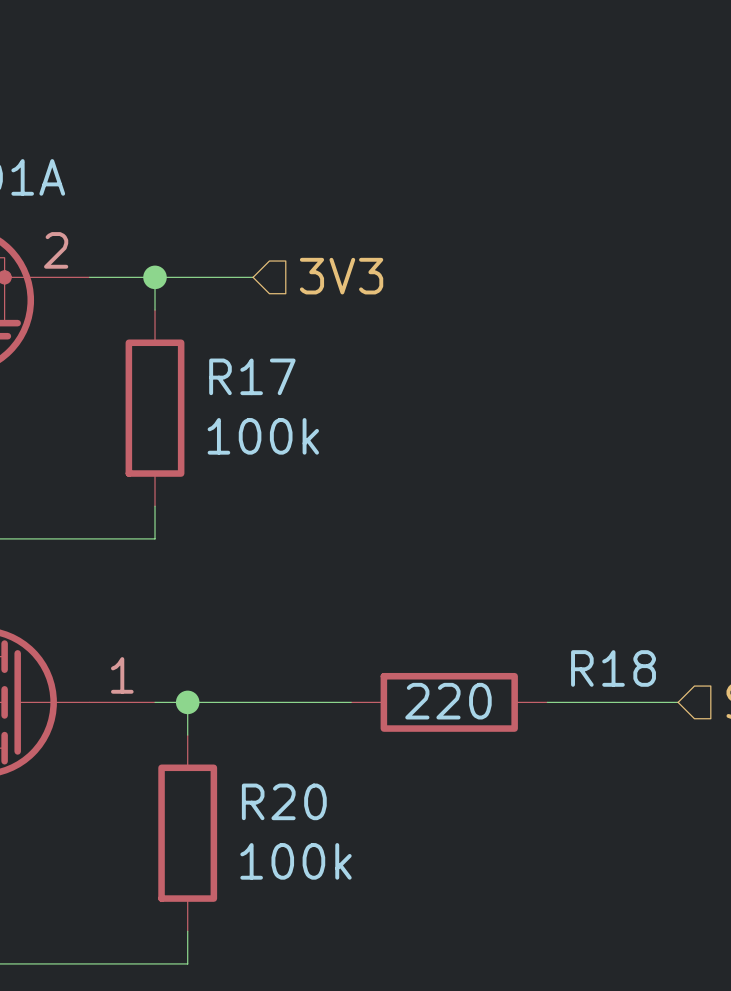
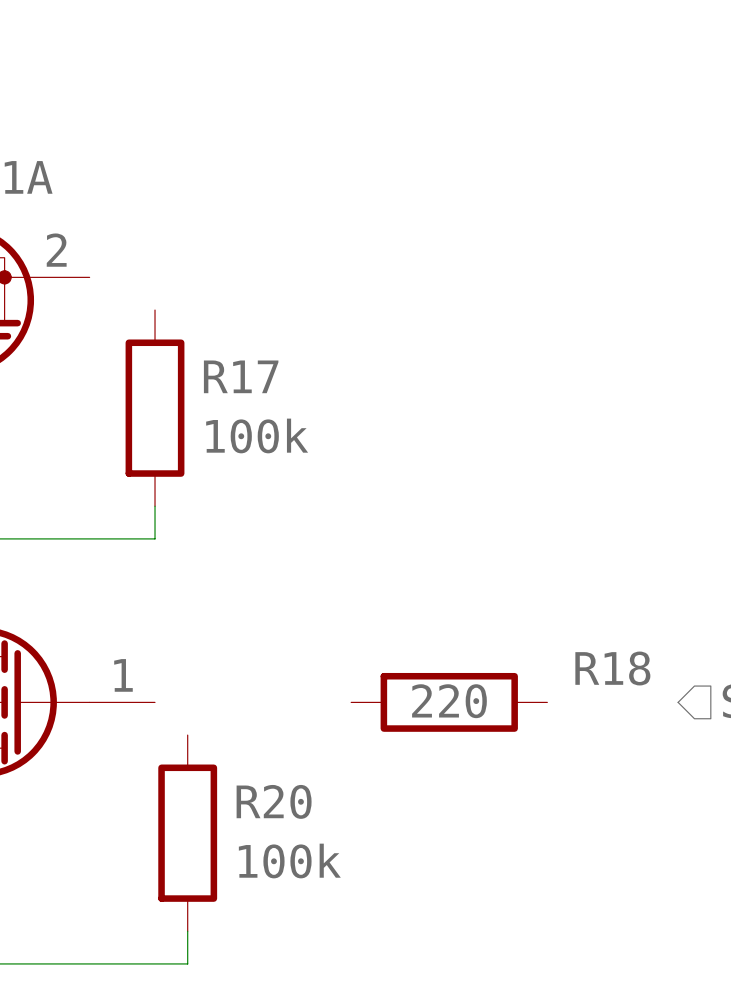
hierarchical label: 3V3 (341, 276) -> none
wire: (89, 277) (253, 277) -> none
wire: (155, 277) (155, 310) -> none
junction: (155, 277) -> none
wire: (155, 702) (351, 702) -> none
wire: (187, 702) (187, 735) -> none
junction: (187, 702) -> none
wire: (547, 702) (678, 702) -> none

